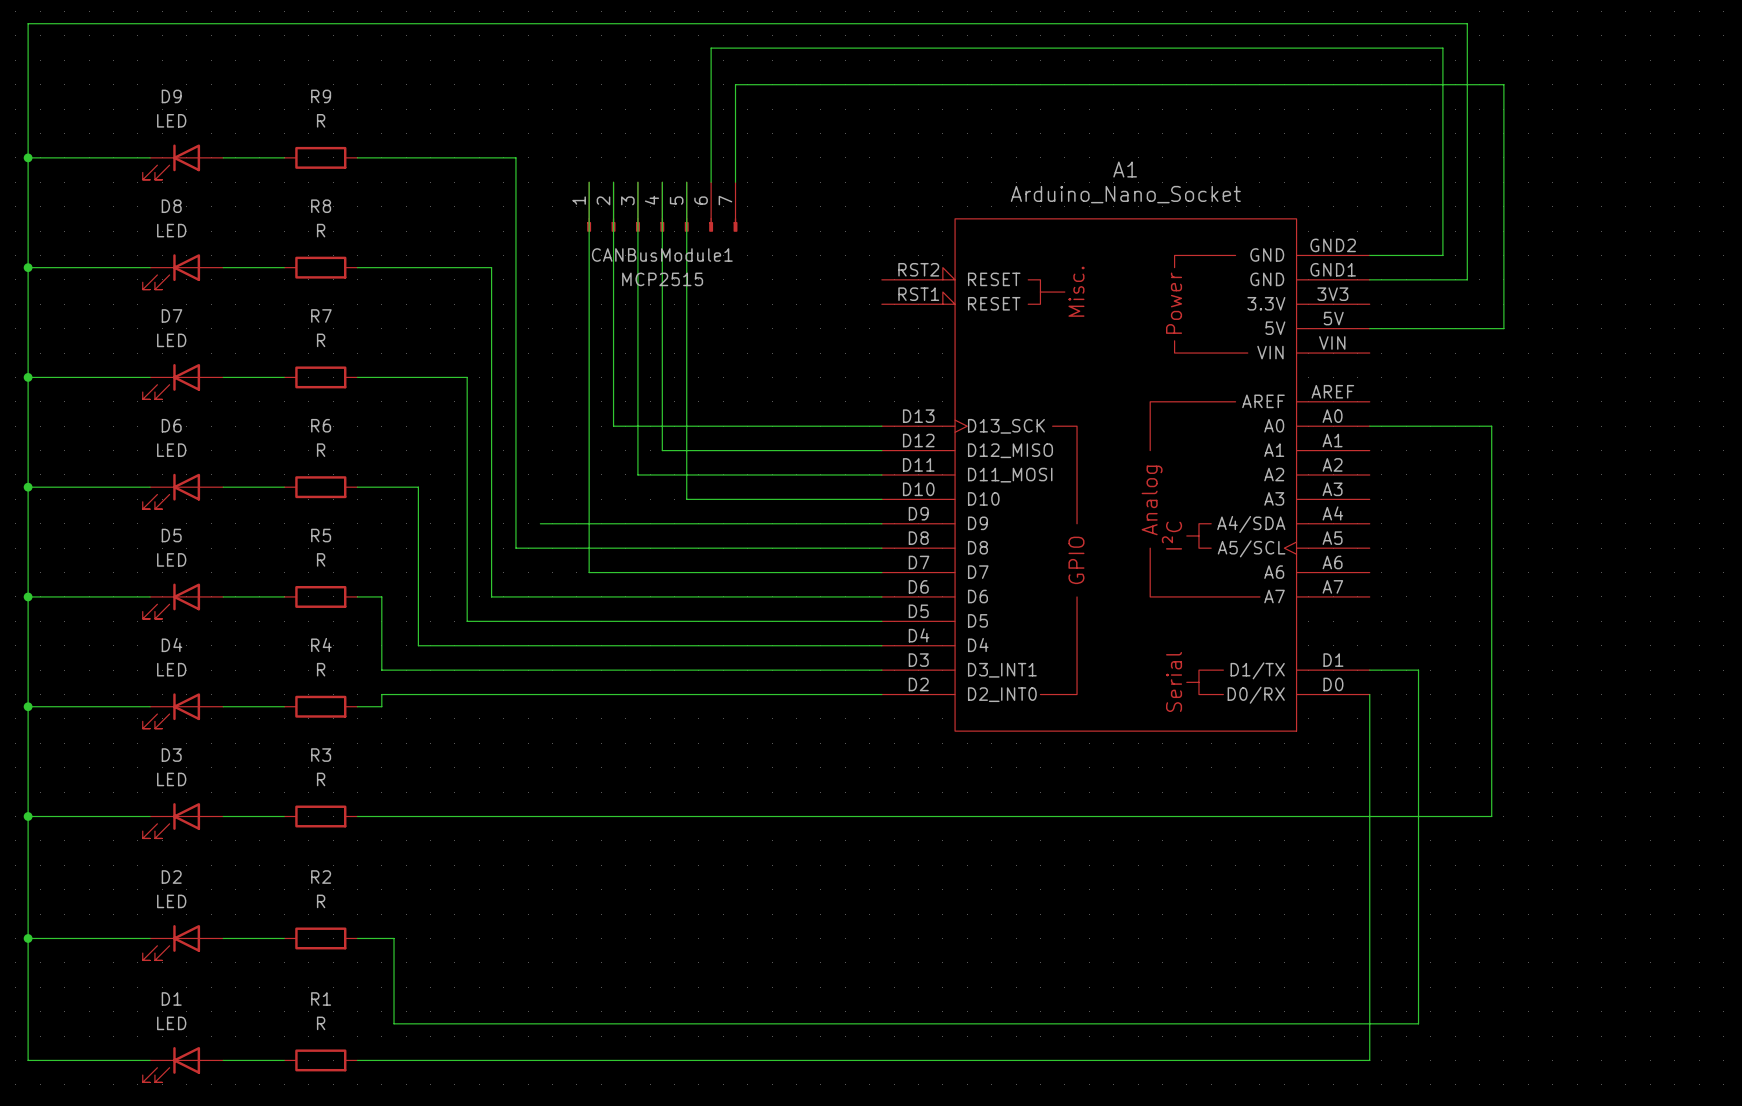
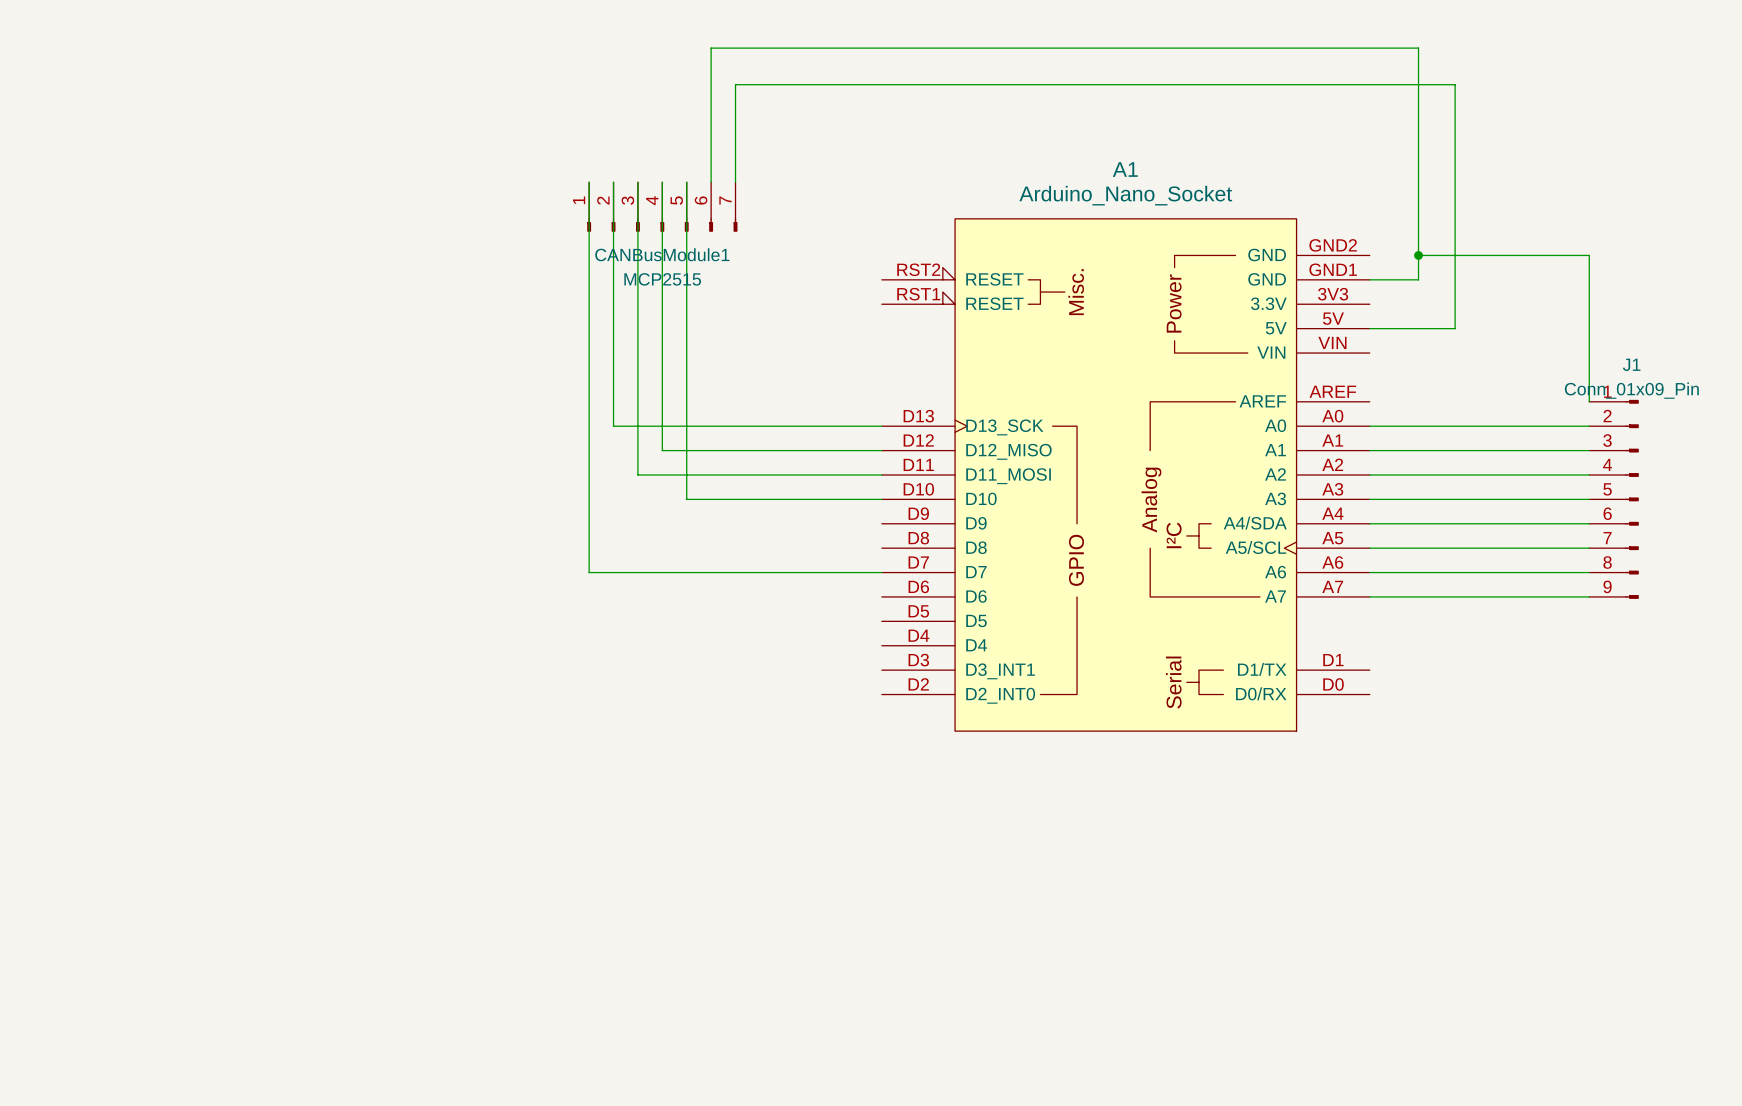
wire: (1418, 48) (1442, 48) (1442, 255) -> (1418, 48) (1418, 279)
wire: (1455, 84) (1503, 84) (1503, 328) (1455, 328) -> (1455, 84) (1455, 328)
wire: (28, 157) (150, 157) -> none
junction: (28, 157) -> none
wire: (223, 157) (284, 157) -> none
R9: R (320, 157) -> none
wire: (357, 157) (515, 157) (515, 548) (881, 548) -> none
D9: LED (183, 162) -> none
wire: (1369, 255) (1418, 255) -> none
junction: none -> (1418, 255)
wire: none -> (1442, 255) (1589, 255) (1589, 401)
wire: (28, 267) (150, 267) -> none
junction: (28, 267) -> none
wire: (223, 267) (284, 267) -> none
R8: R (320, 267) -> none
wire: (357, 267) (491, 267) (491, 596) (881, 596) -> none
D8: LED (183, 271) -> none
wire: (1418, 279) (1467, 279) (1467, 23) (28, 23) (28, 1060) (150, 1060) -> none
wire: (28, 377) (150, 377) -> none
junction: (28, 377) -> none
wire: (223, 377) (284, 377) -> none
R7: R (320, 377) -> none
wire: (357, 377) (467, 377) (467, 621) (881, 621) -> none
D7: LED (183, 381) -> none
wire: (1491, 426) (1491, 816) (357, 816) -> (1491, 426) (1589, 426)
wire: none -> (1369, 450) (1589, 450)
wire: none -> (1369, 474) (1589, 474)
wire: (28, 487) (150, 487) -> none
junction: (28, 487) -> none
wire: (223, 487) (284, 487) -> none
R6: R (320, 487) -> none
wire: (357, 487) (418, 487) (418, 645) (881, 645) -> none
D6: LED (183, 491) -> none
wire: none -> (1369, 499) (1589, 499)
J1: none -> Conn_01x09_Pin (1614, 499)
wire: (540, 523) (881, 523) -> none
wire: none -> (1369, 523) (1589, 523)
wire: none -> (1369, 548) (1589, 548)
wire: none -> (1369, 572) (1589, 572)
wire: (28, 596) (150, 596) -> none
junction: (28, 596) -> none
wire: (223, 596) (284, 596) -> none
R5: R (320, 596) -> none
wire: (357, 596) (381, 596) (381, 670) (881, 670) -> none
wire: none -> (1369, 596) (1589, 596)
D5: LED (183, 601) -> none
wire: (1369, 670) (1418, 670) (1418, 1023) (394, 1023) (394, 938) (357, 938) -> none
wire: (881, 694) (381, 694) (381, 706) (357, 706) -> none
wire: (1369, 694) (1369, 1060) (357, 1060) -> none
wire: (28, 706) (150, 706) -> none
junction: (28, 706) -> none
wire: (223, 706) (284, 706) -> none
R4: R (320, 706) -> none
D4: LED (183, 710) -> none
wire: (28, 816) (150, 816) -> none
junction: (28, 816) -> none
wire: (223, 816) (284, 816) -> none
R3: R (320, 816) -> none
D3: LED (183, 820) -> none
wire: (28, 938) (150, 938) -> none
junction: (28, 938) -> none
wire: (223, 938) (284, 938) -> none
R2: R (320, 938) -> none
D2: LED (183, 942) -> none
wire: (223, 1060) (284, 1060) -> none
R1: R (320, 1060) -> none
D1: LED (183, 1064) -> none

